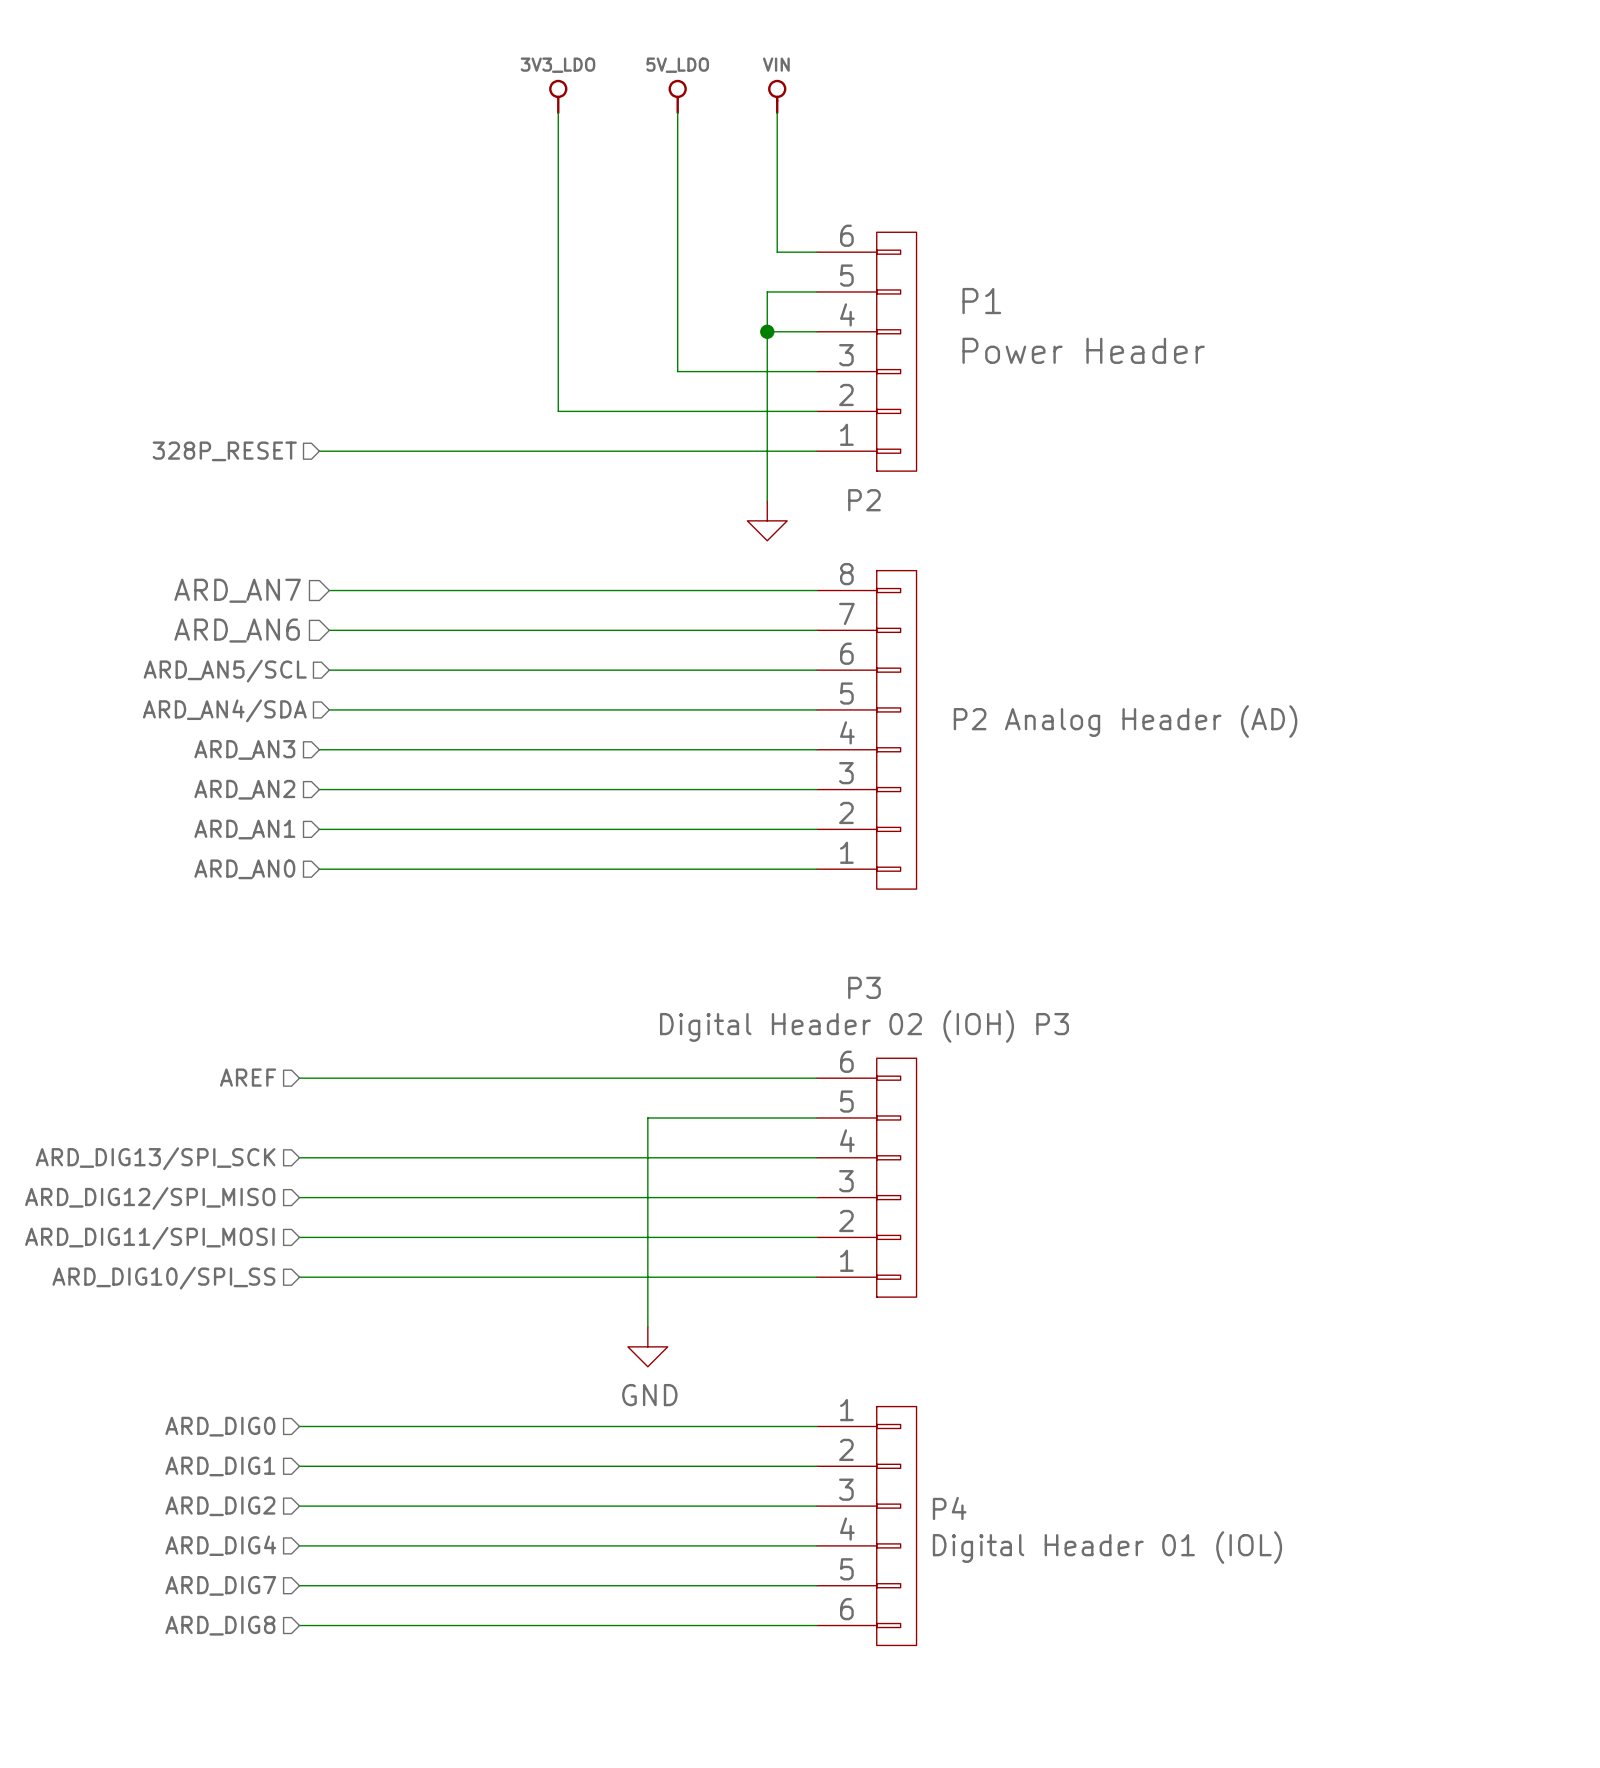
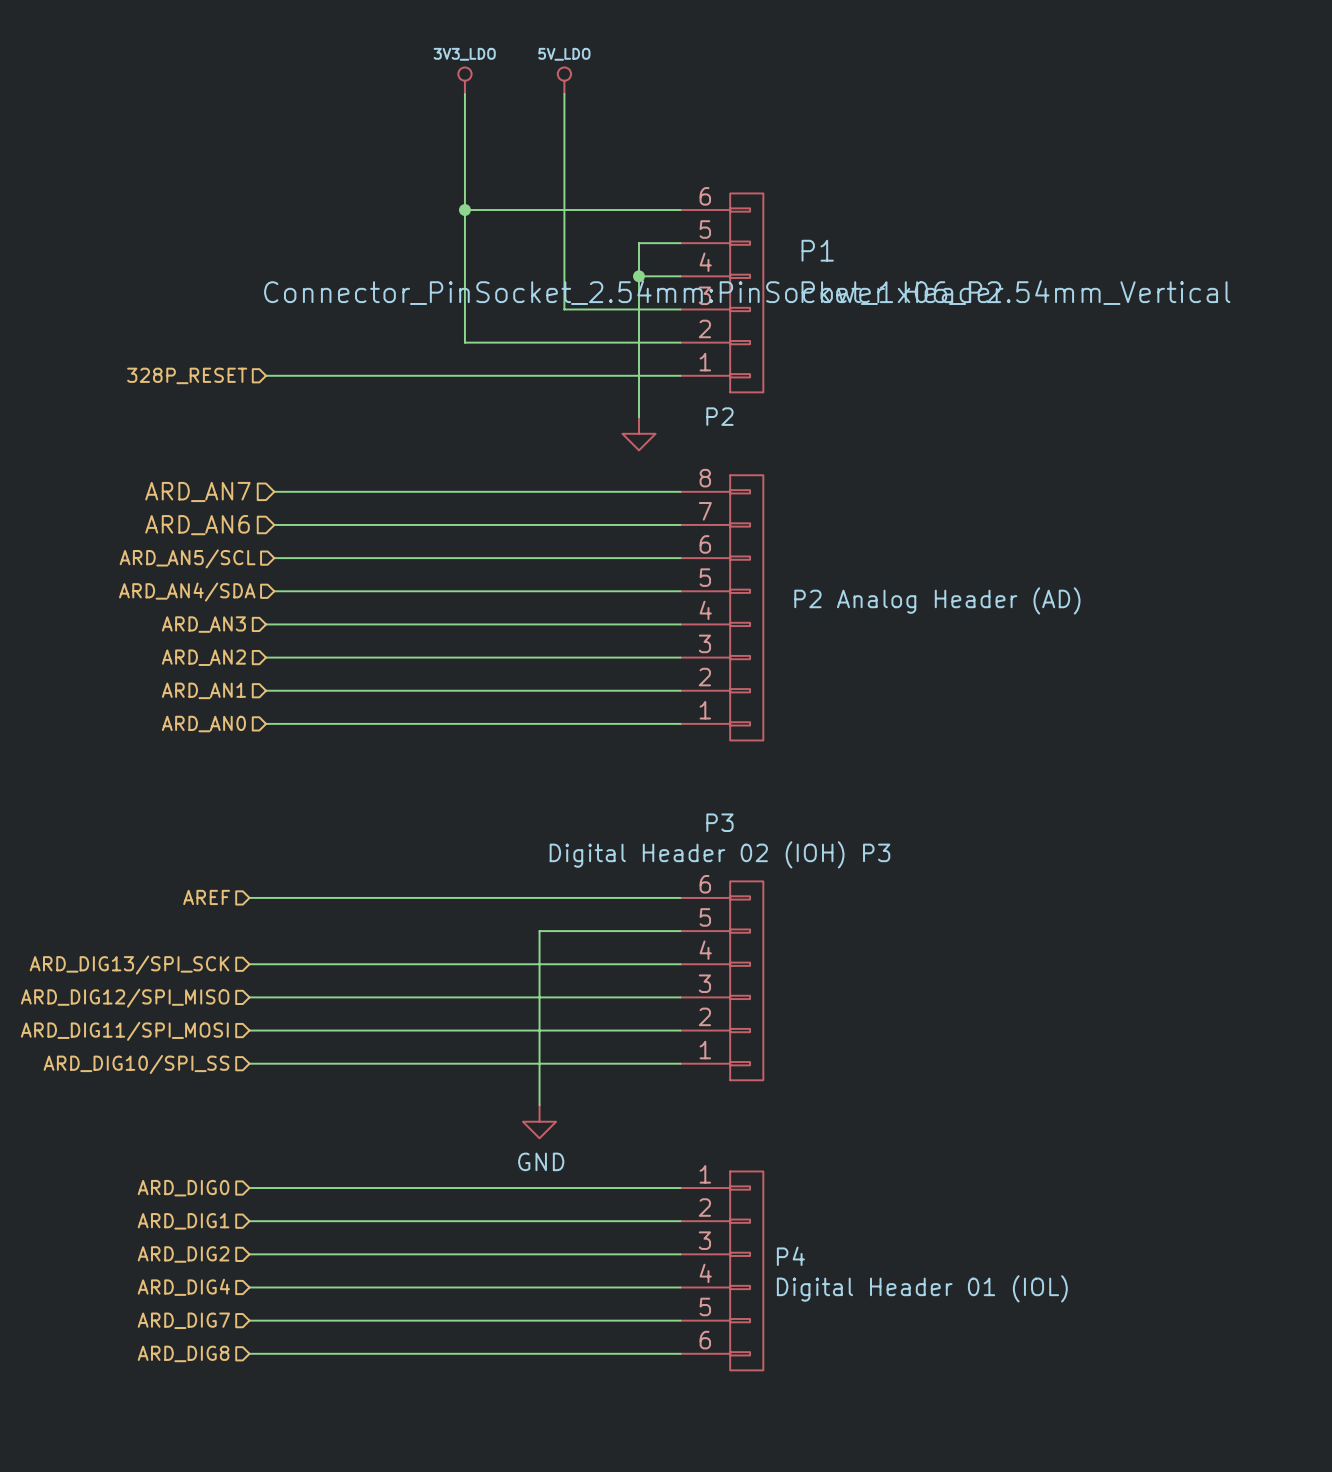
power symbol: VIN (777, 96) -> none
wire: (777, 112) (777, 252) -> (464, 210) (647, 210)
junction: none -> (464, 210)
P1 text: none -> Connector_PinSocket_2.54mm:PinSocket_1x06_P2.54mm_Vertical (747, 292)

